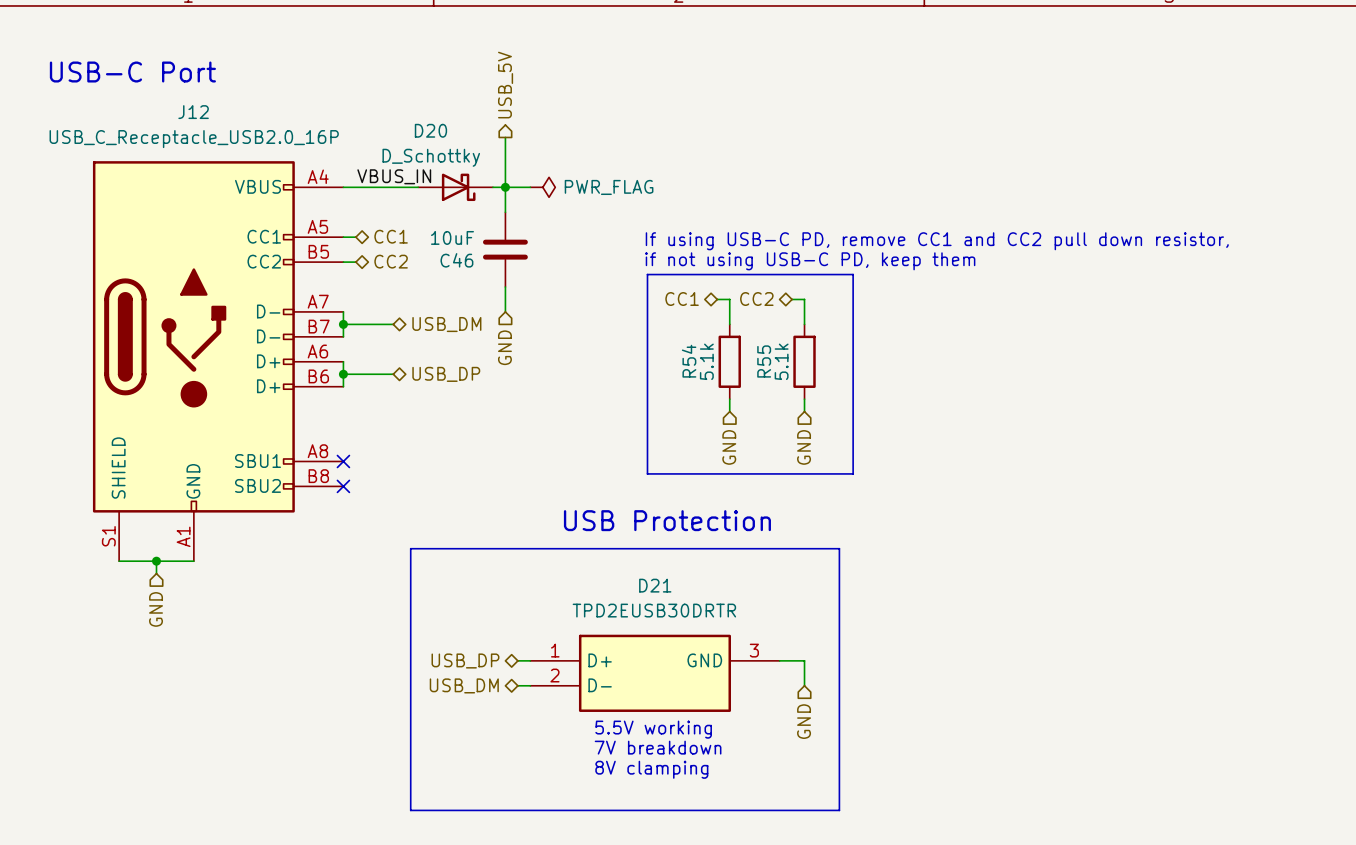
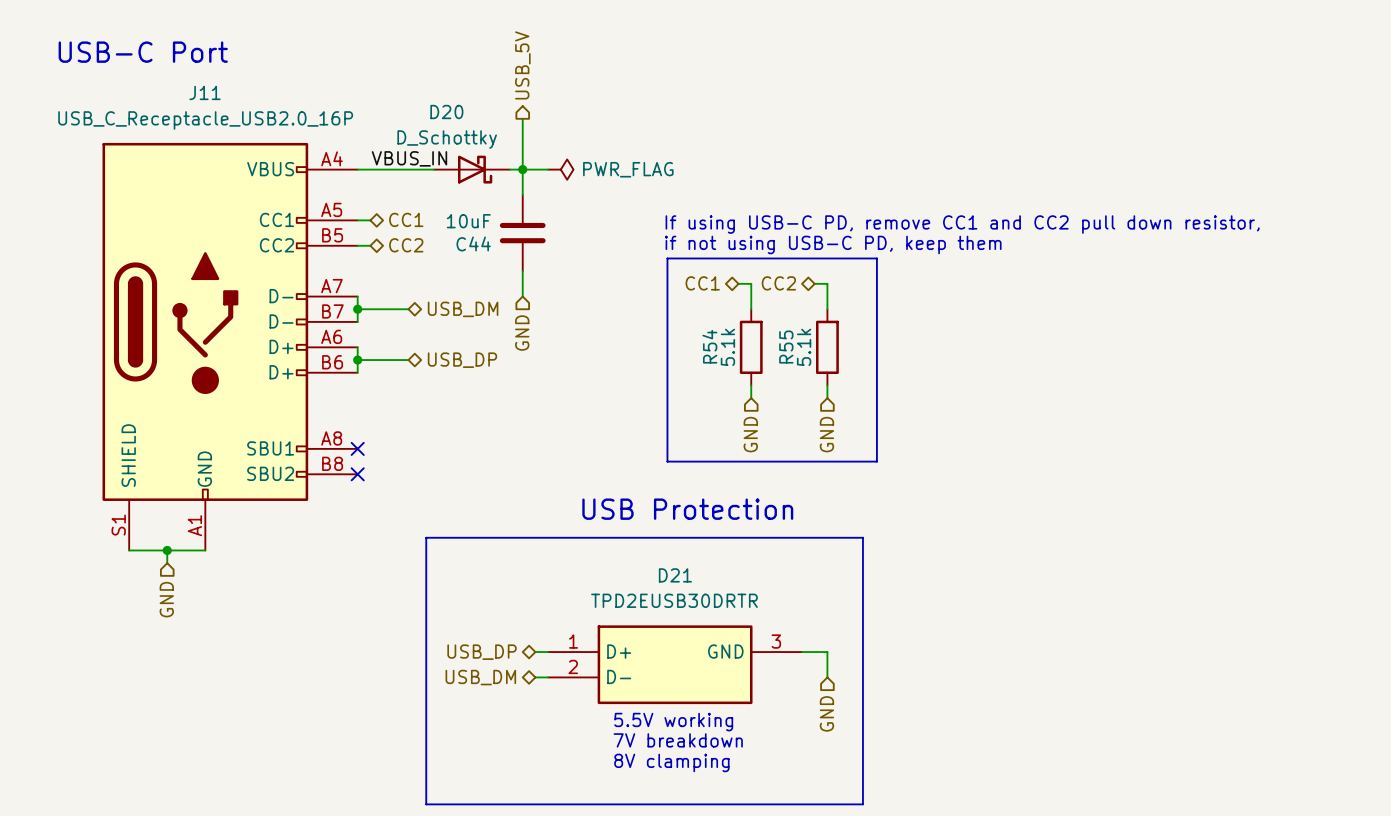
J12 name: J12 (193, 112) -> J11 (205, 92)
C46 name: C46 (456, 260) -> C44 (473, 243)

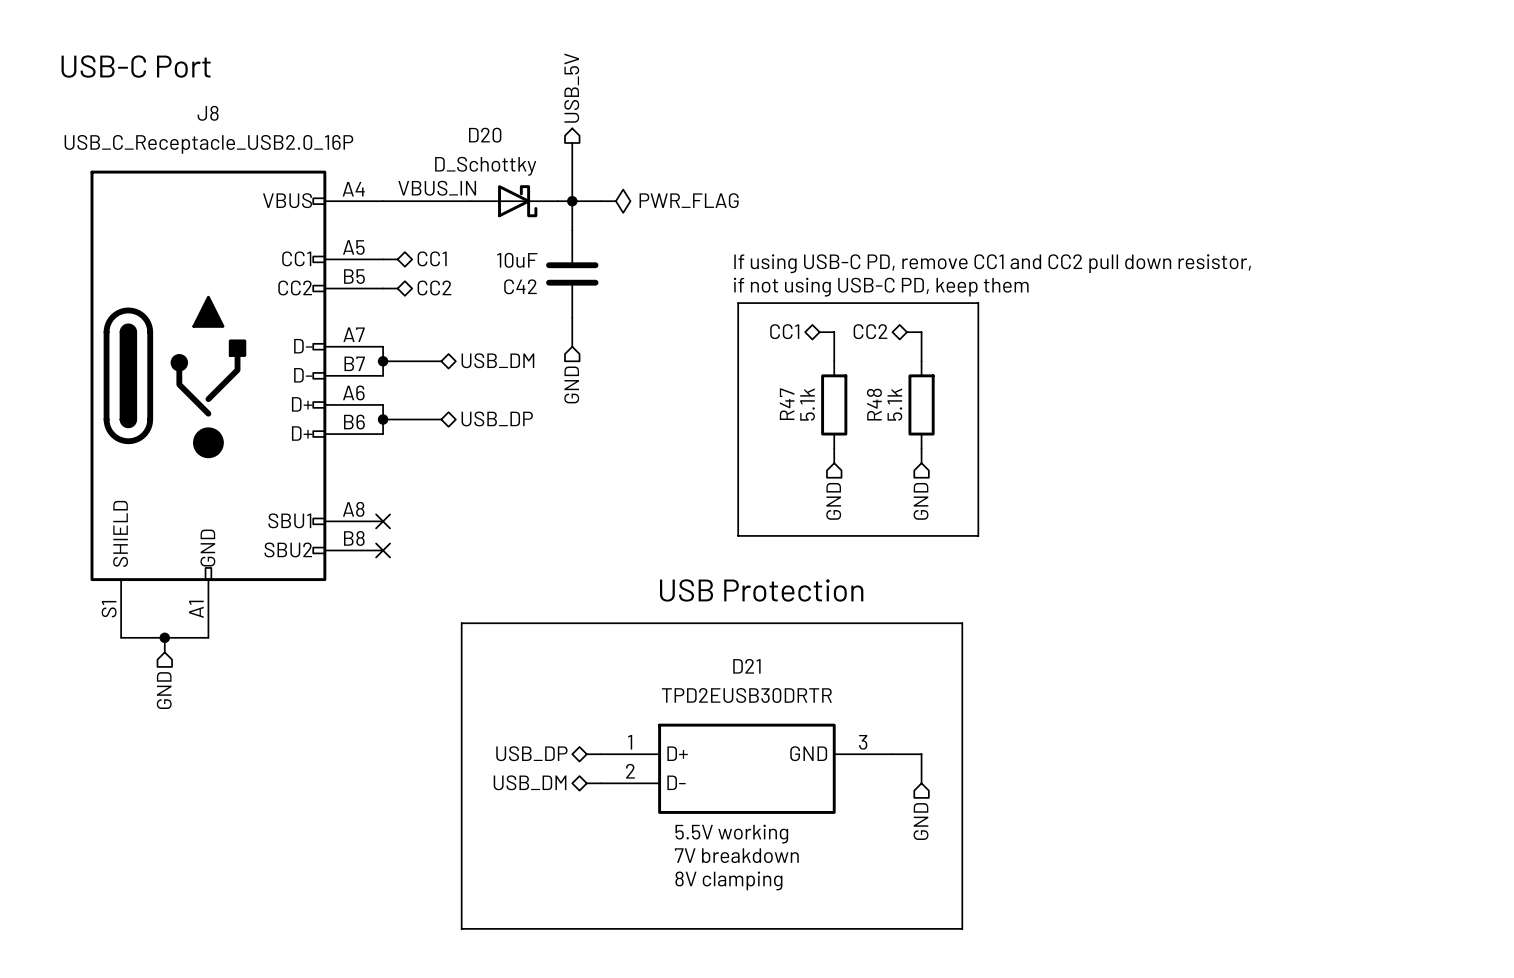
J11 name: J11 (205, 92) -> J8 (208, 113)
C44 name: C44 (473, 243) -> C42 (520, 286)
R54 name: R54 (709, 346) -> R47 (787, 404)
R55 name: R55 (786, 347) -> R48 (874, 404)

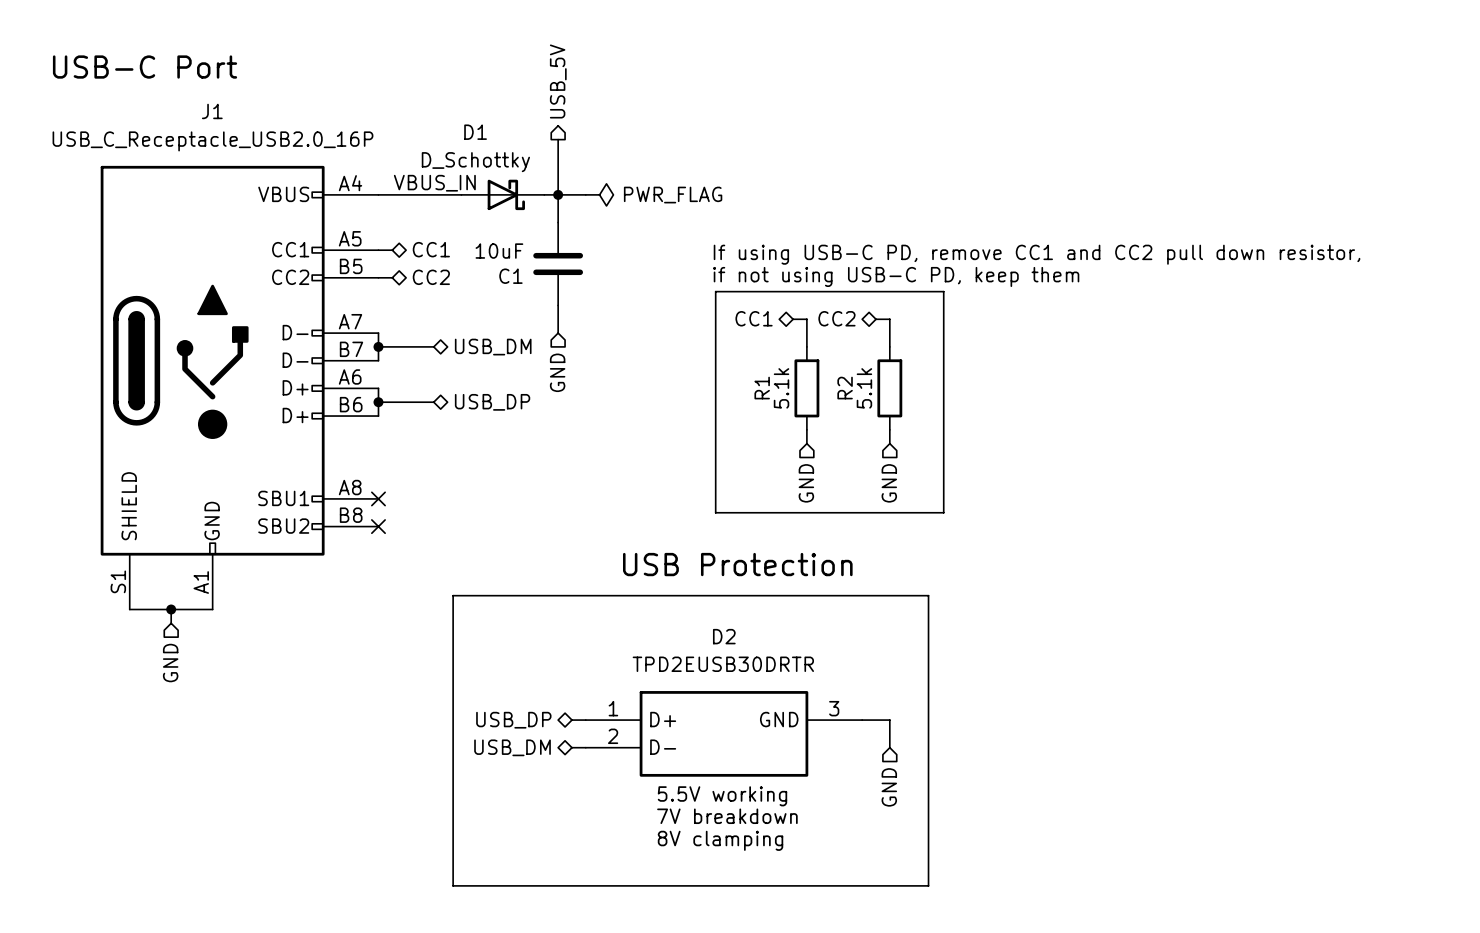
J8 name: J8 (208, 113) -> J1 (212, 111)
D20 name: D20 (485, 135) -> D1 (475, 132)
C42 name: C42 (520, 286) -> C1 (510, 276)
R47 name: R47 (787, 404) -> R1 (762, 388)
R48 name: R48 (874, 404) -> R2 (845, 388)
D21 name: D21 (746, 666) -> D2 (724, 636)

